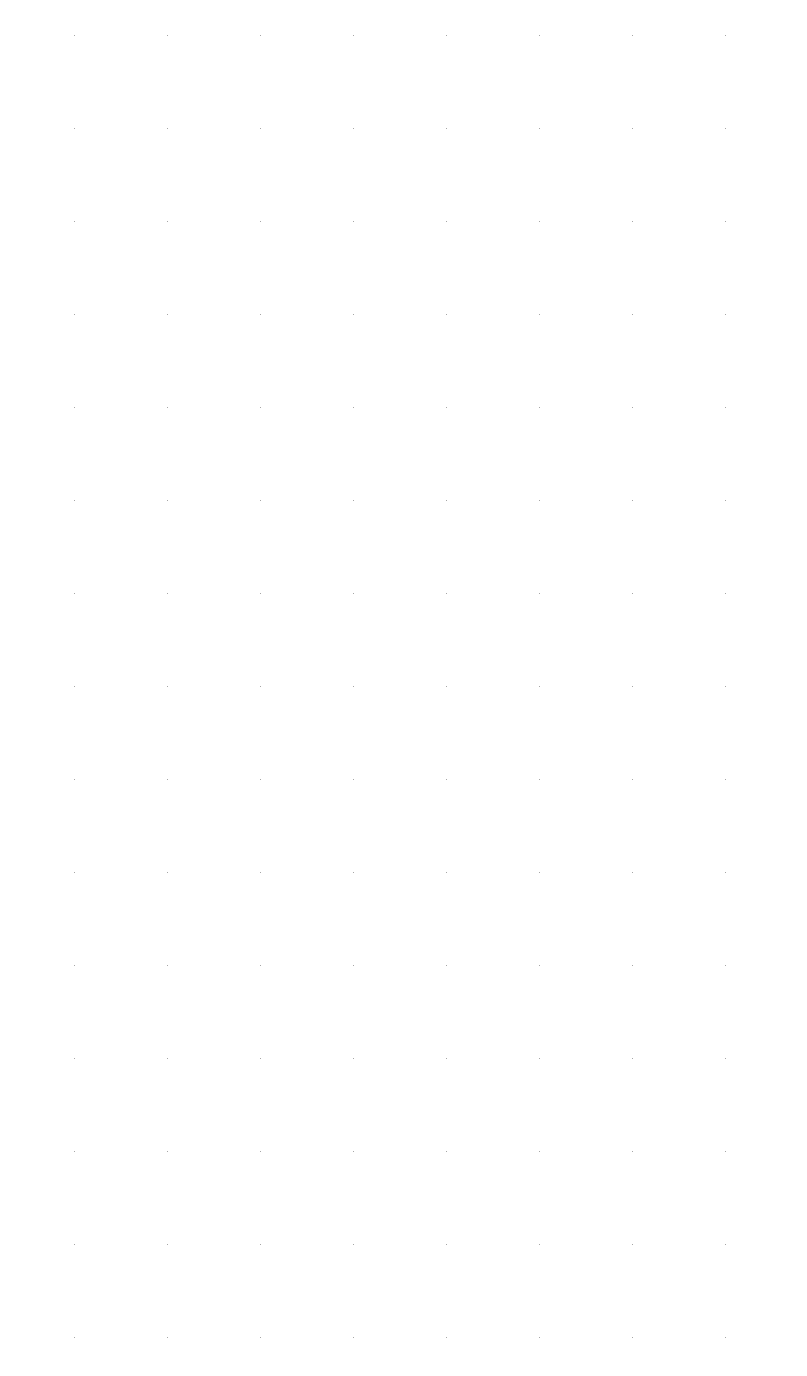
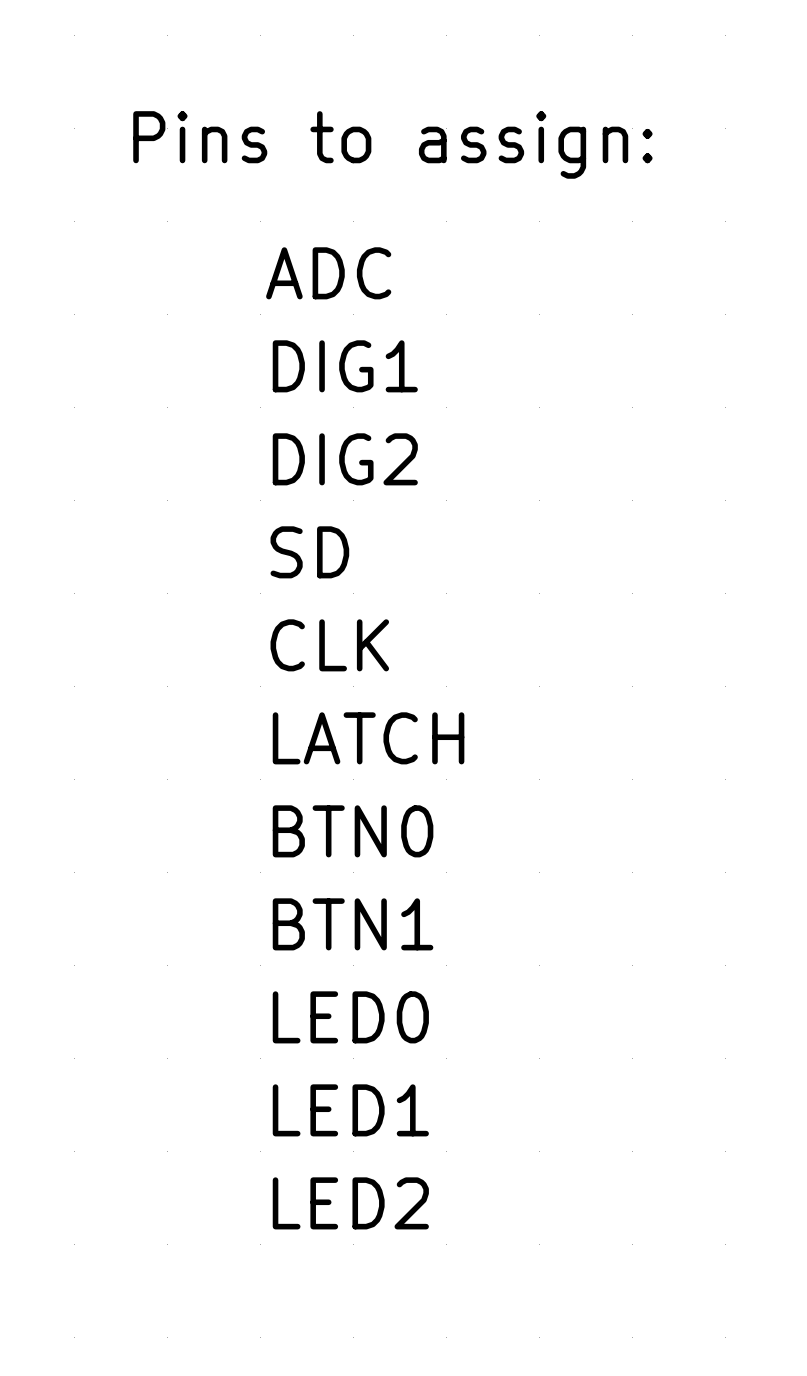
text: none -> Pins to assign: (392, 144)
label: none -> ADC (328, 273)
label: none -> DIG1 (345, 366)
label: none -> DIG2 (345, 459)
label: none -> SD (309, 552)
label: none -> CLK (329, 645)
label: none -> LATCH (368, 738)
label: none -> BTN0 (353, 831)
label: none -> BTN1 (353, 924)
label: none -> LED0 (350, 1017)
label: none -> LED1 (350, 1110)
label: none -> LED2 (350, 1203)

